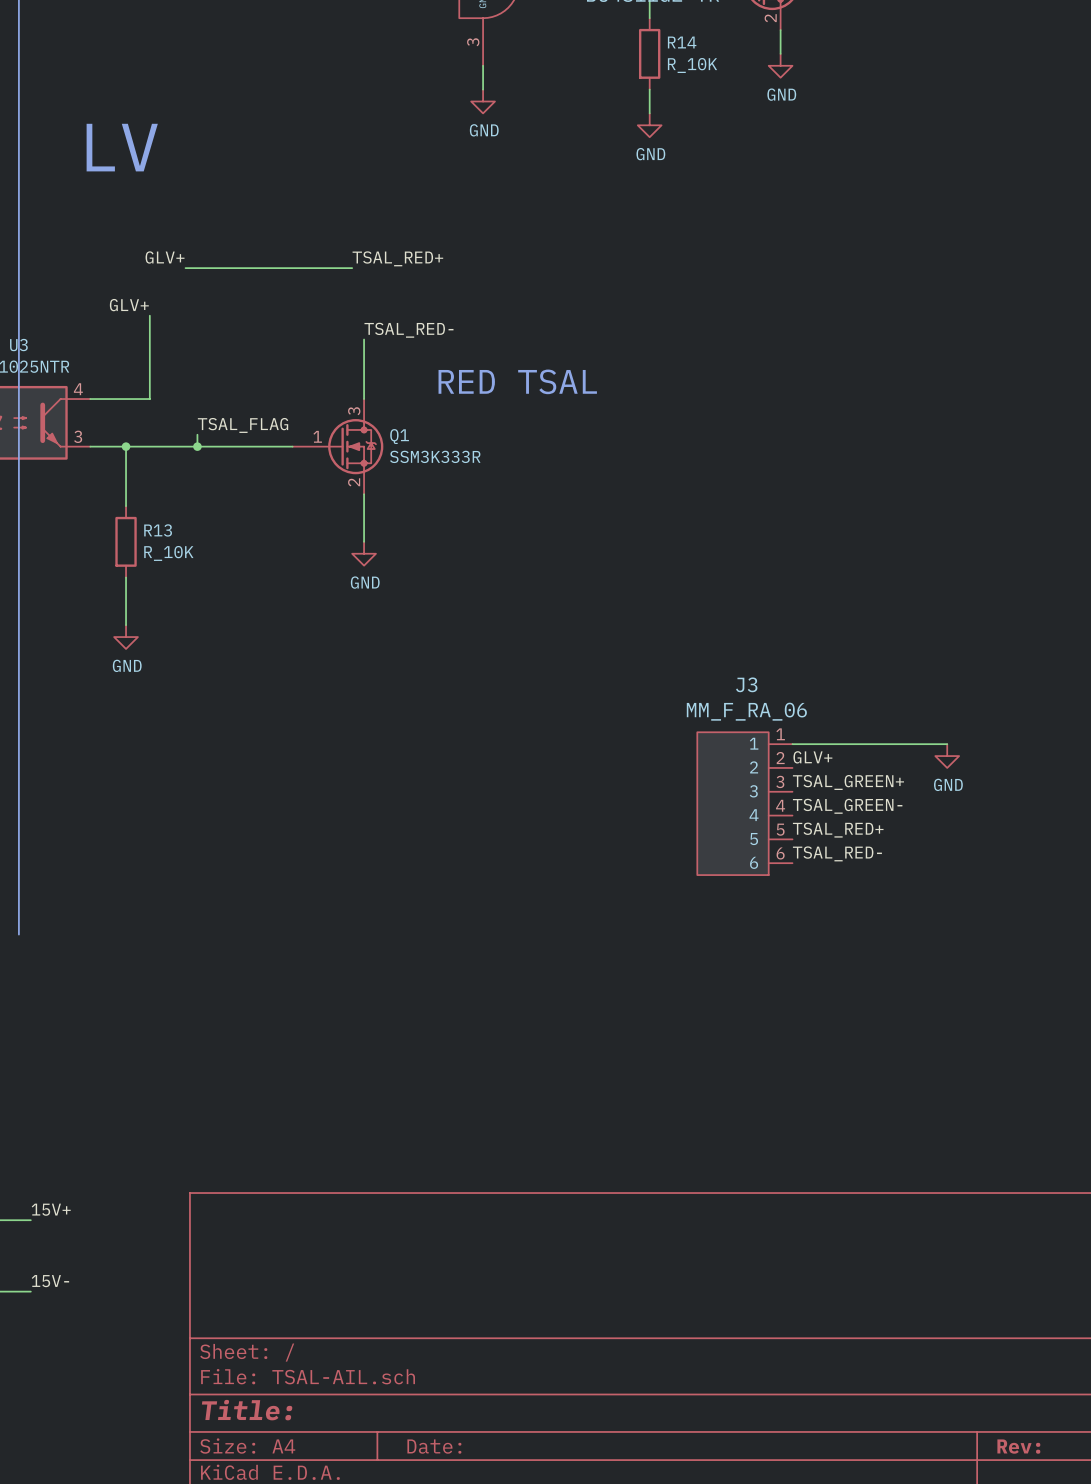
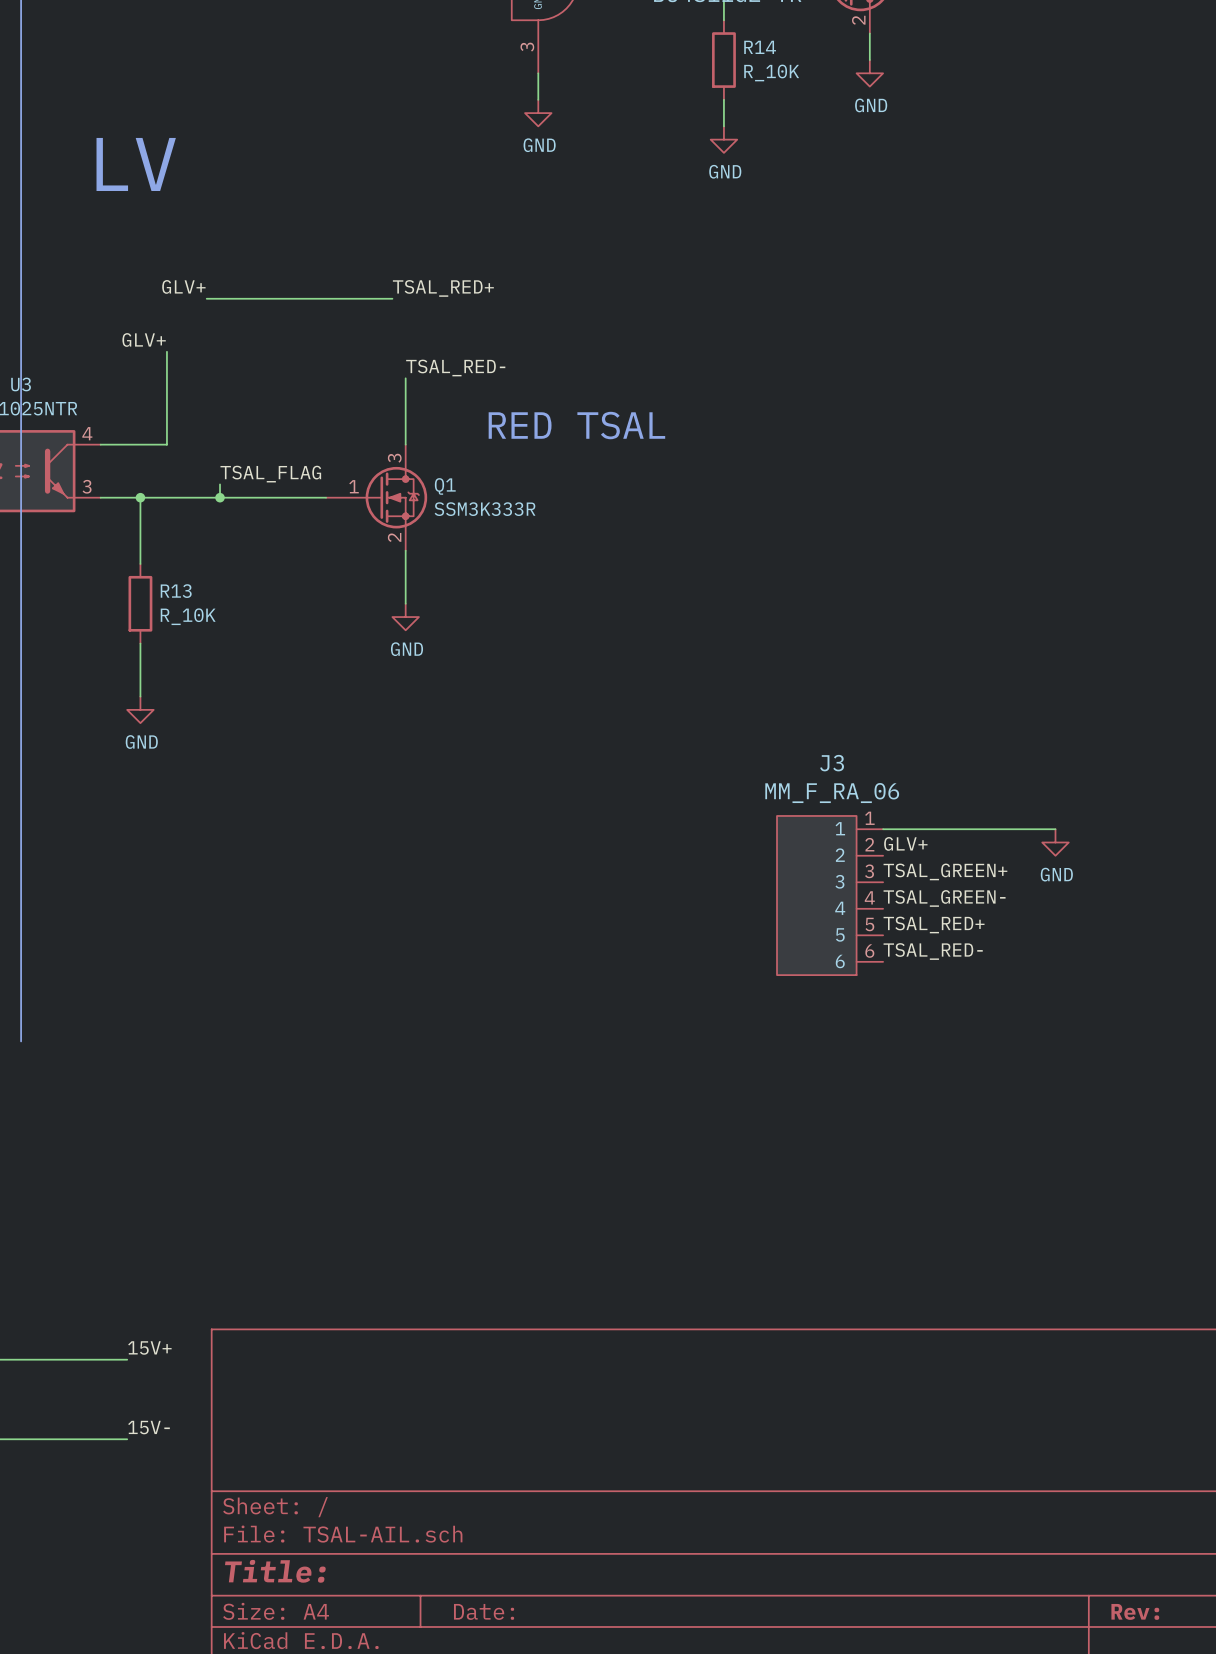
label position: 15V+ (51, 1209) -> 15V+ (149, 1347)
wire: none -> (34, 1359) (127, 1359)
label position: 15V- (50, 1281) -> 15V- (149, 1427)
wire: none -> (34, 1439) (127, 1439)

